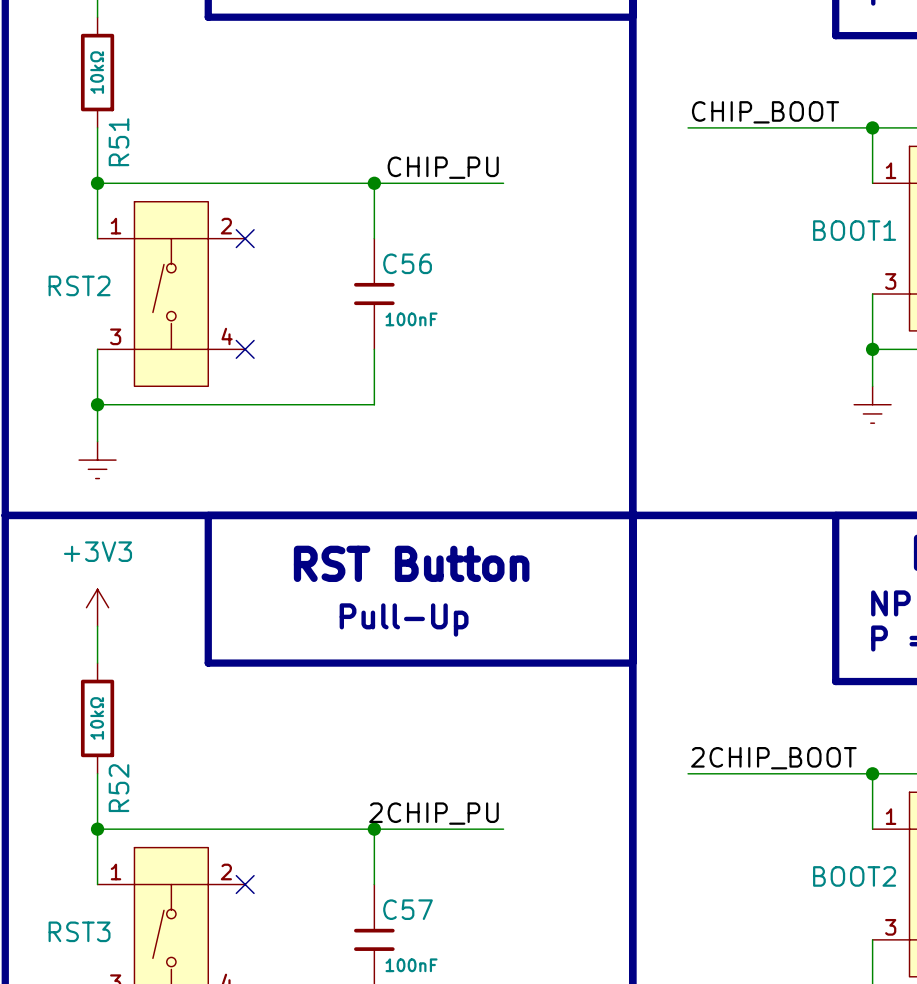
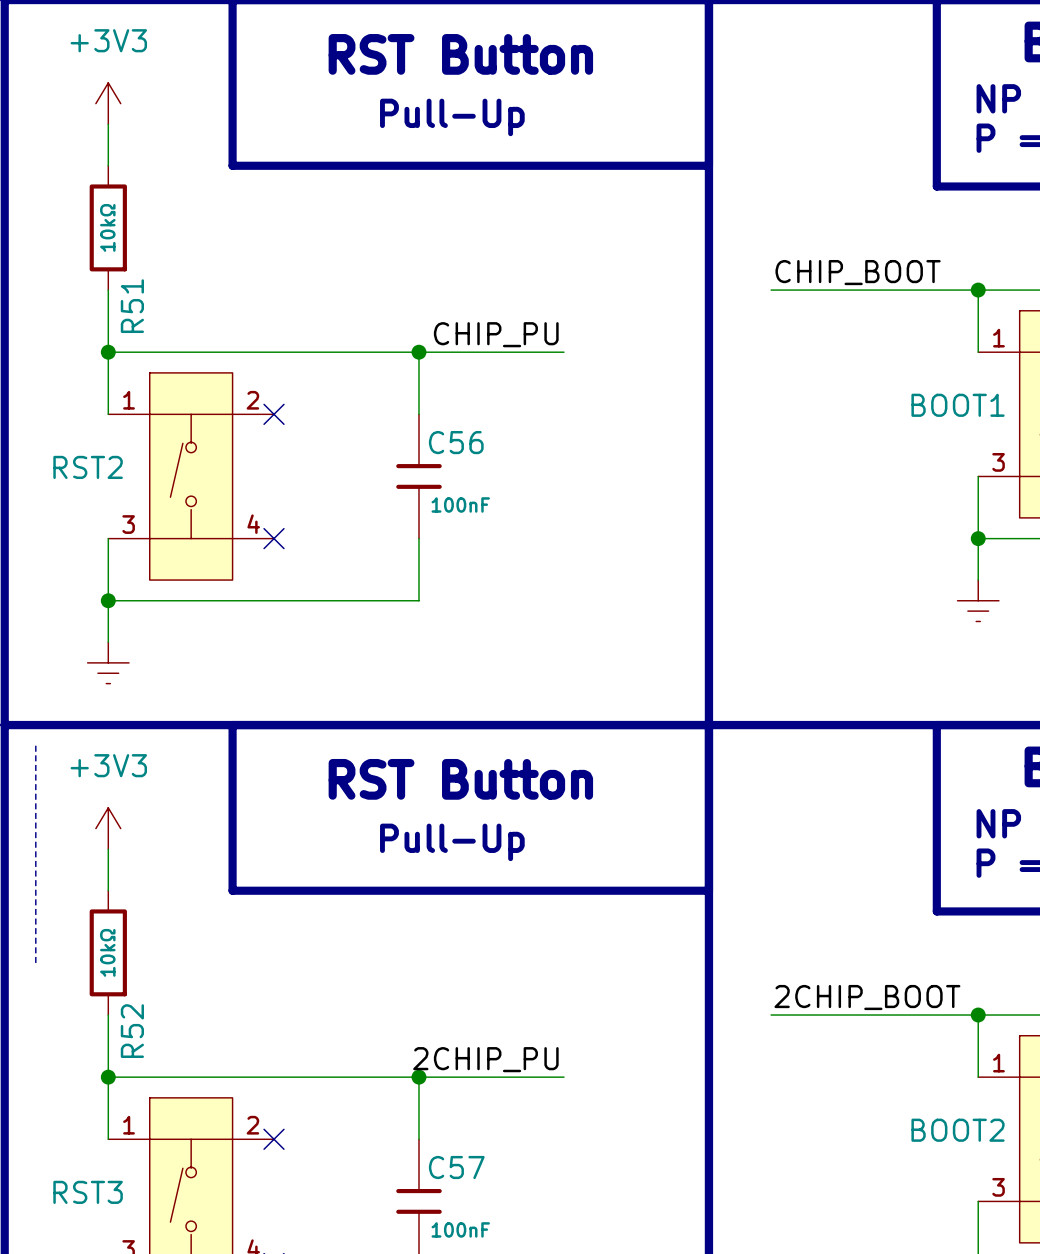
line: none -> (35, 745) (35, 963)

